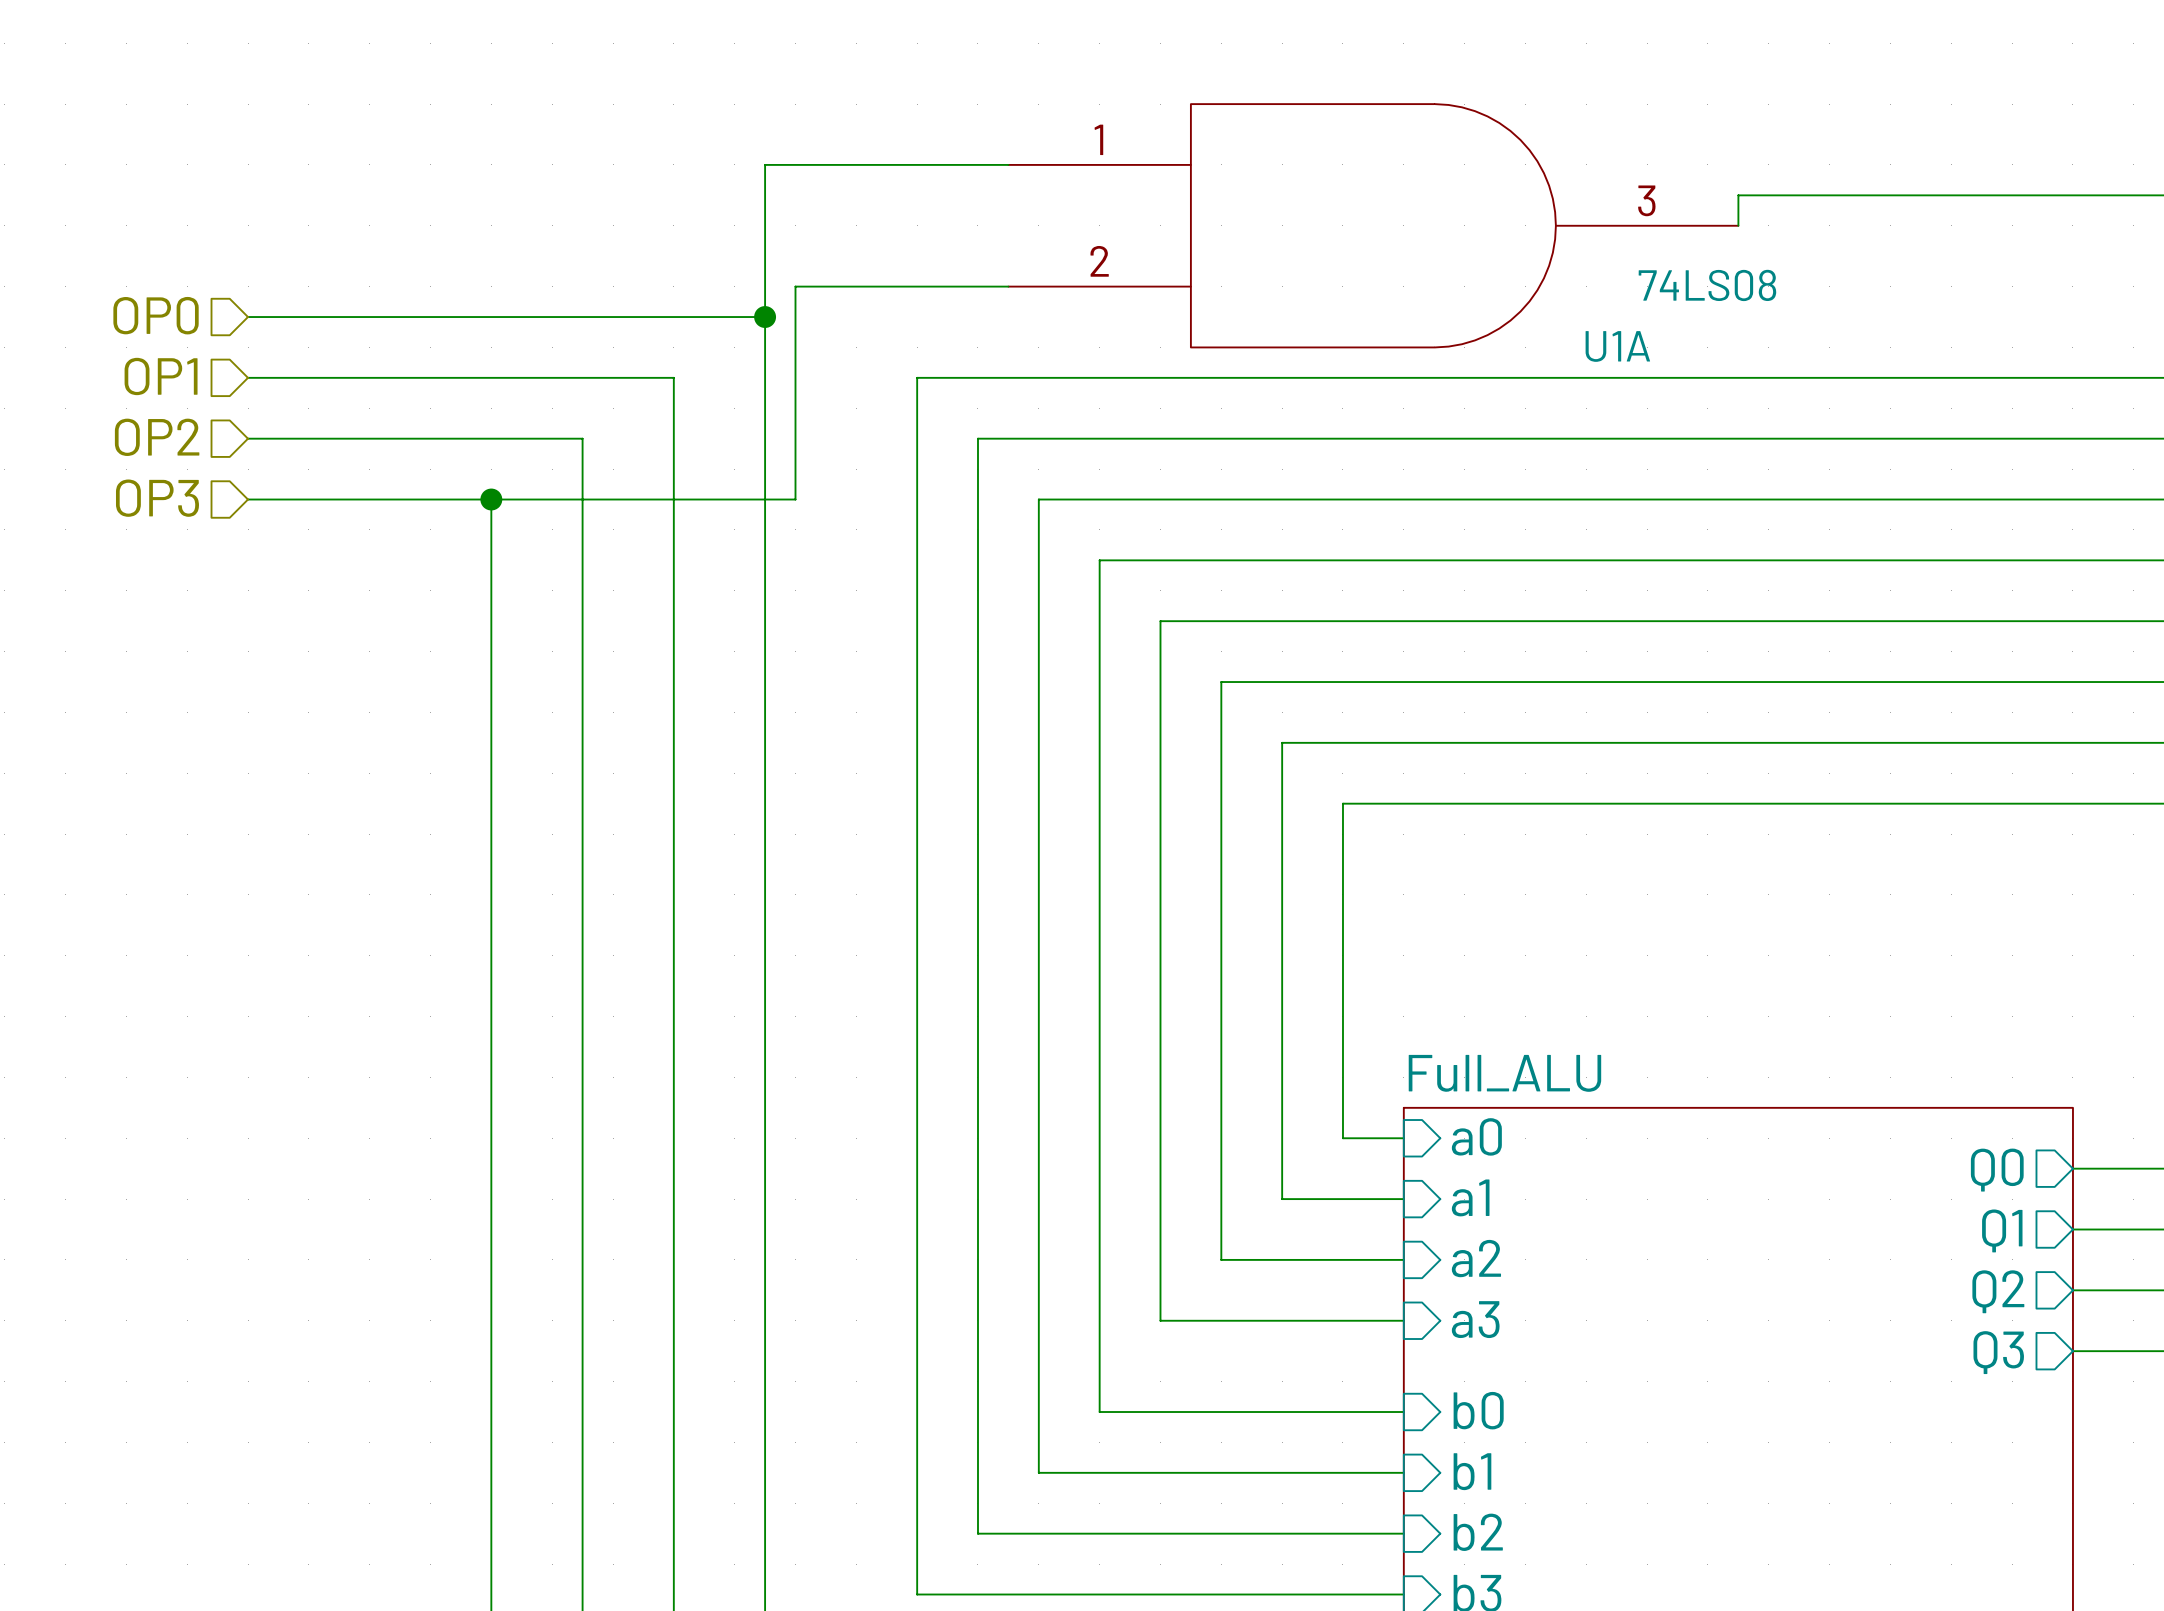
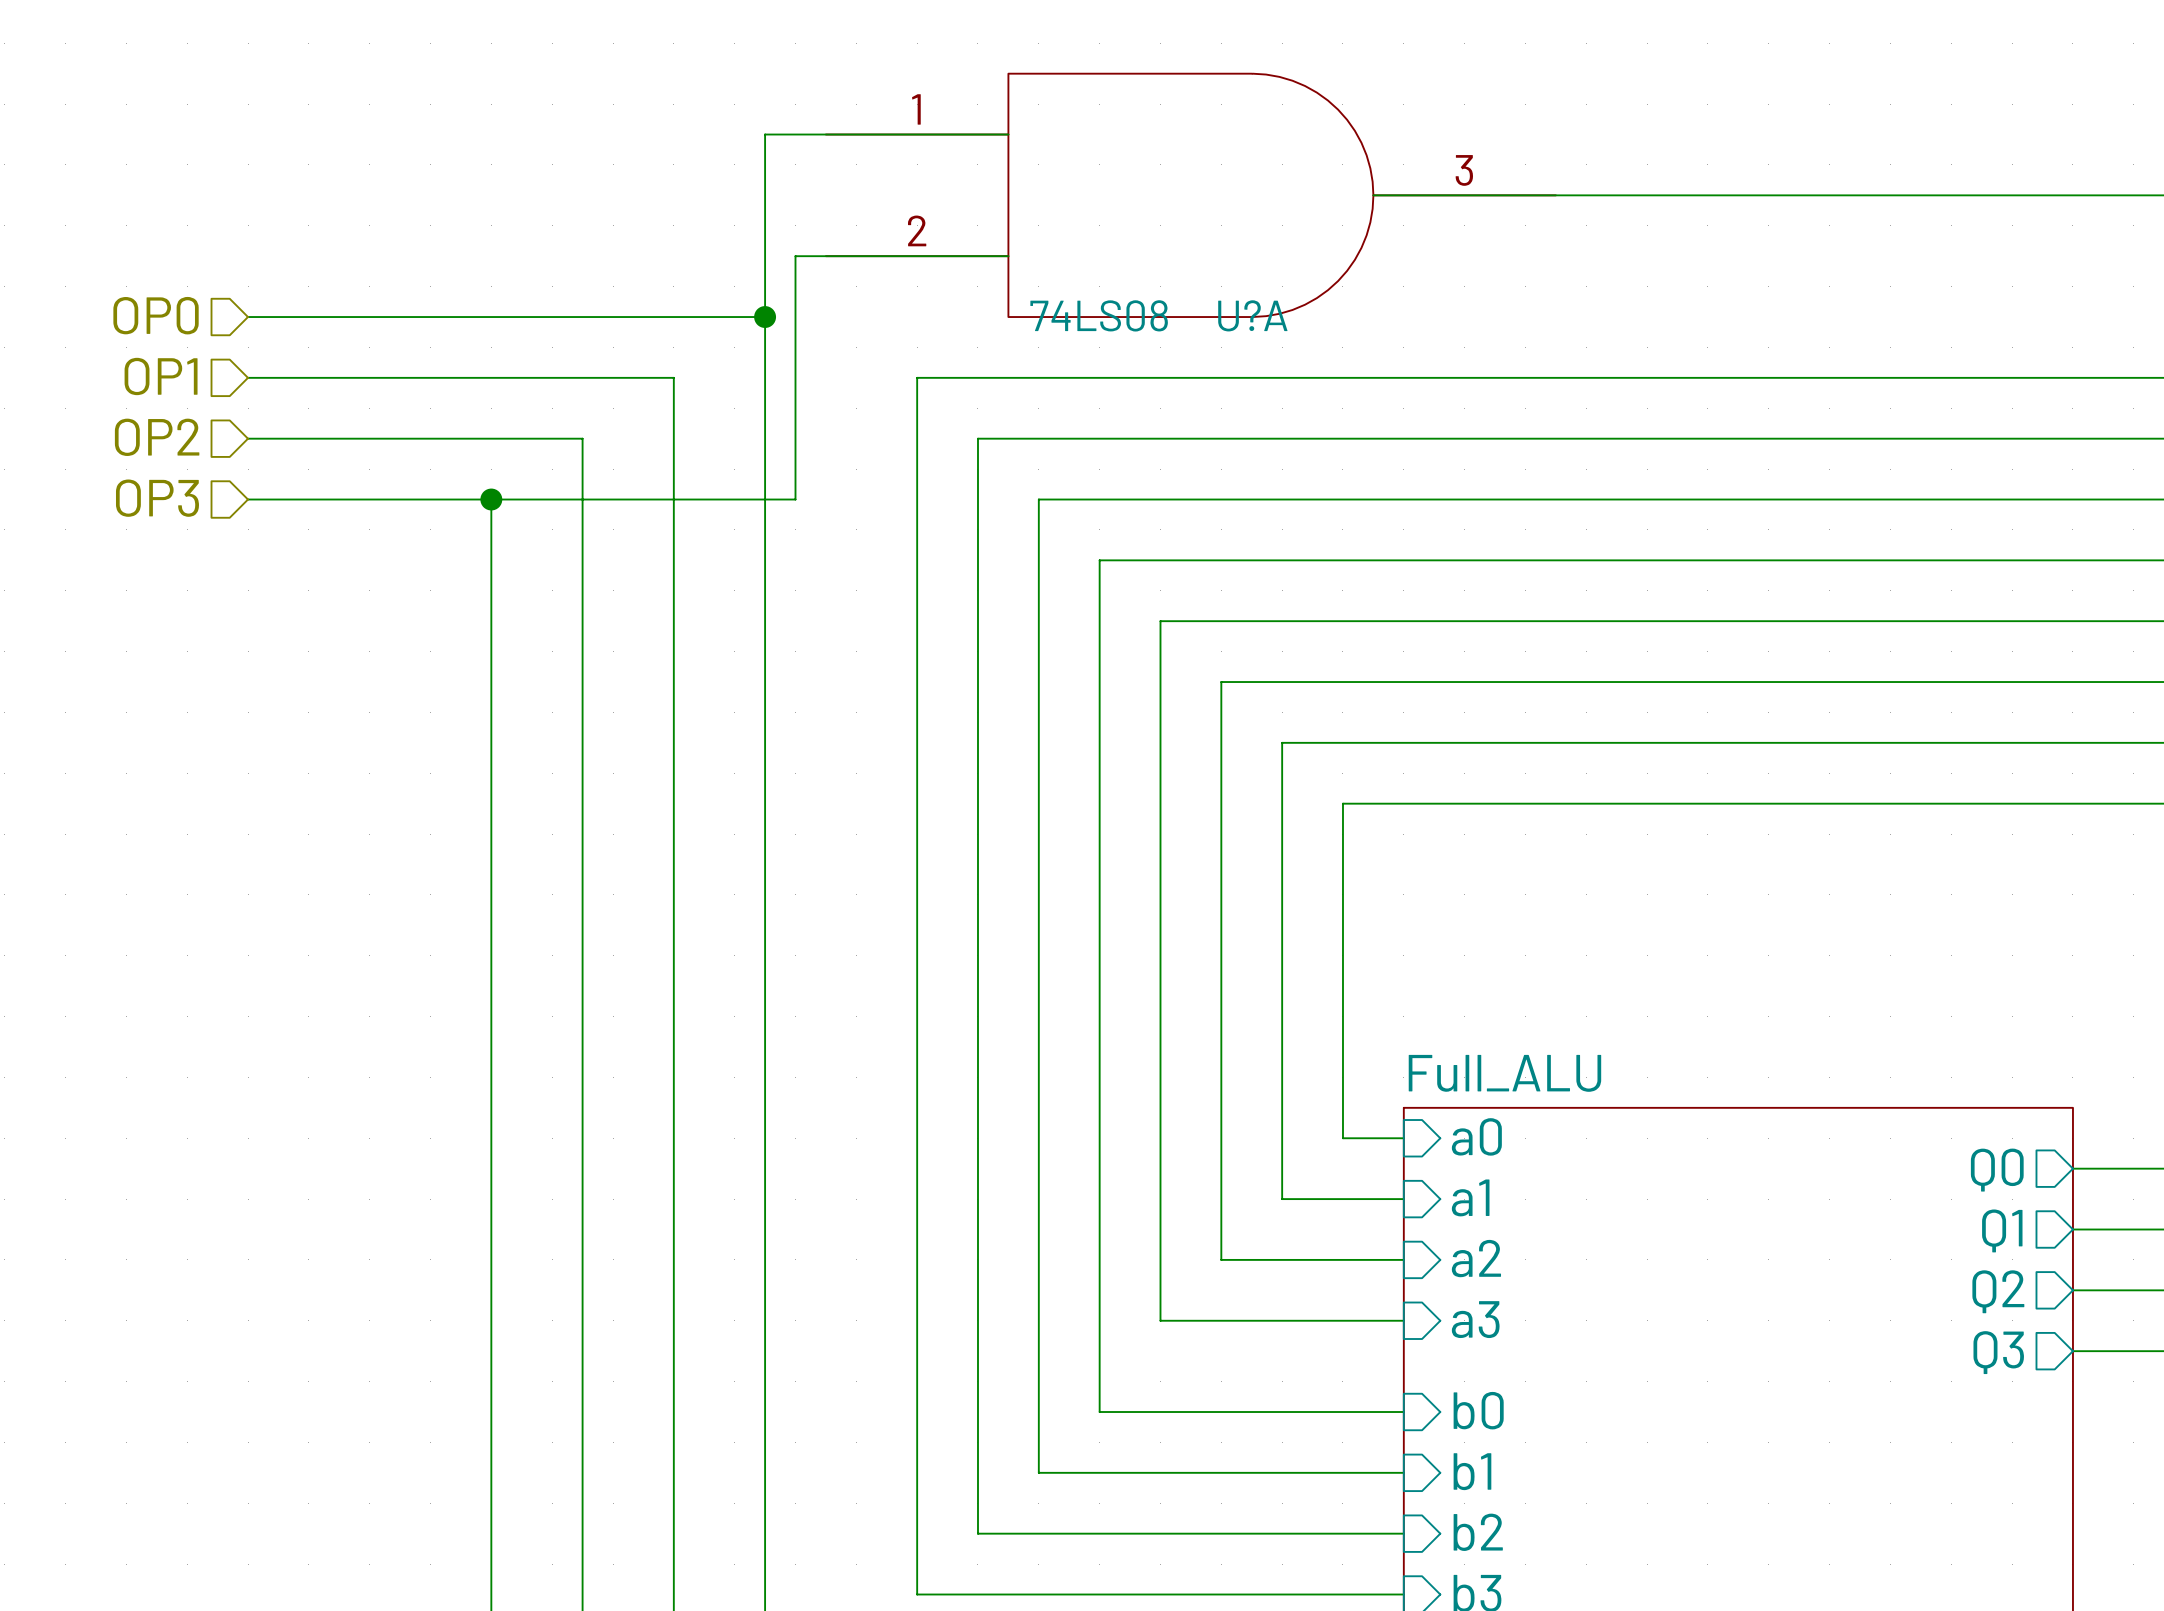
wire: (765, 164) (1008, 164) -> (765, 164) (765, 134) (1008, 134)
U?A: none -> 74LS08 (1190, 195)
wire: (1738, 195) (1738, 225) -> (1738, 195) (1373, 195)
U1A: 74LS08 (1373, 225) -> none
wire: (795, 286) (1008, 286) -> (795, 286) (795, 256) (1008, 256)

